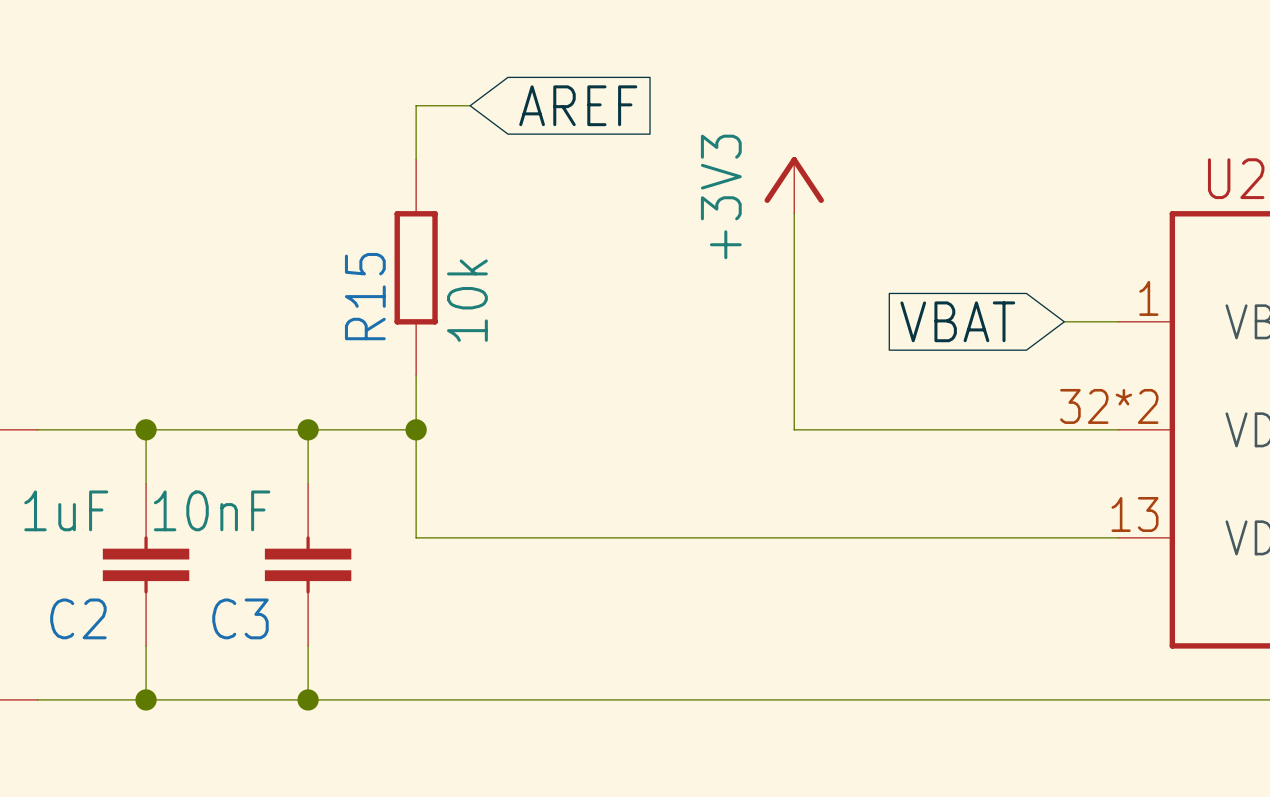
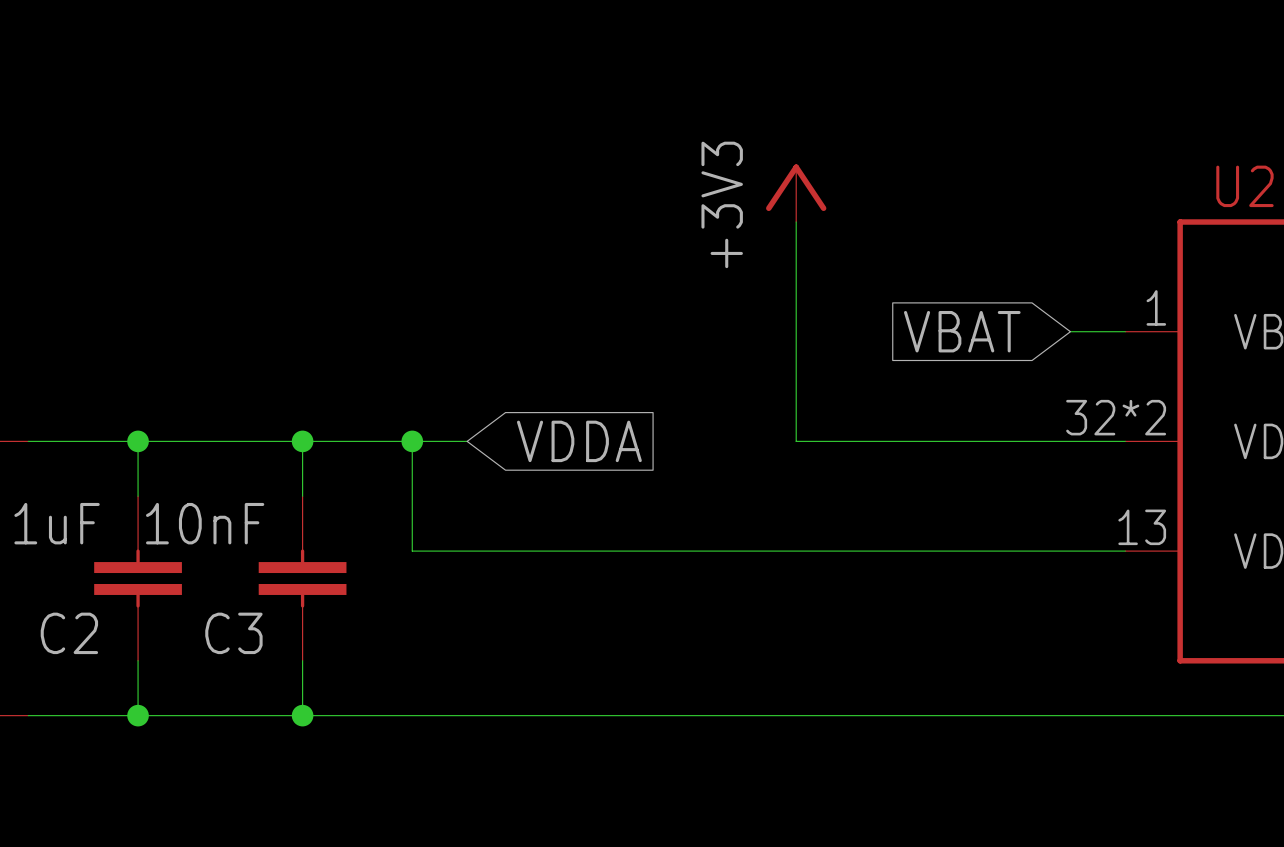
wire: (470, 105) (416, 105) (416, 159) -> none
global label: AREF (578, 105) -> none
R15: 10k (416, 267) -> none
wire: (416, 375) (416, 429) -> (467, 441) (412, 441)
global label: none -> VDDA (579, 441)

